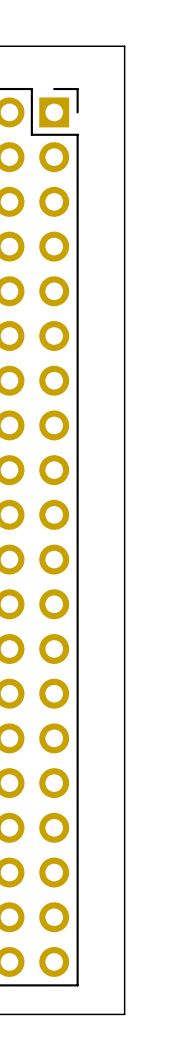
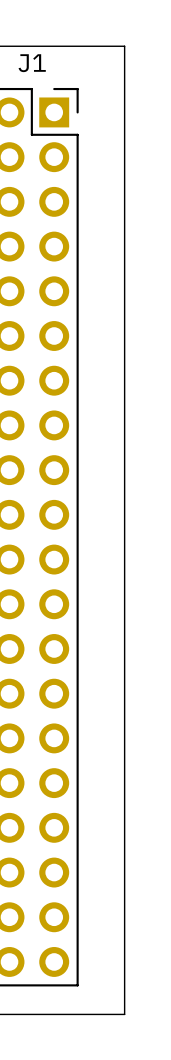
J1 name: none -> J1 (32, 63)

